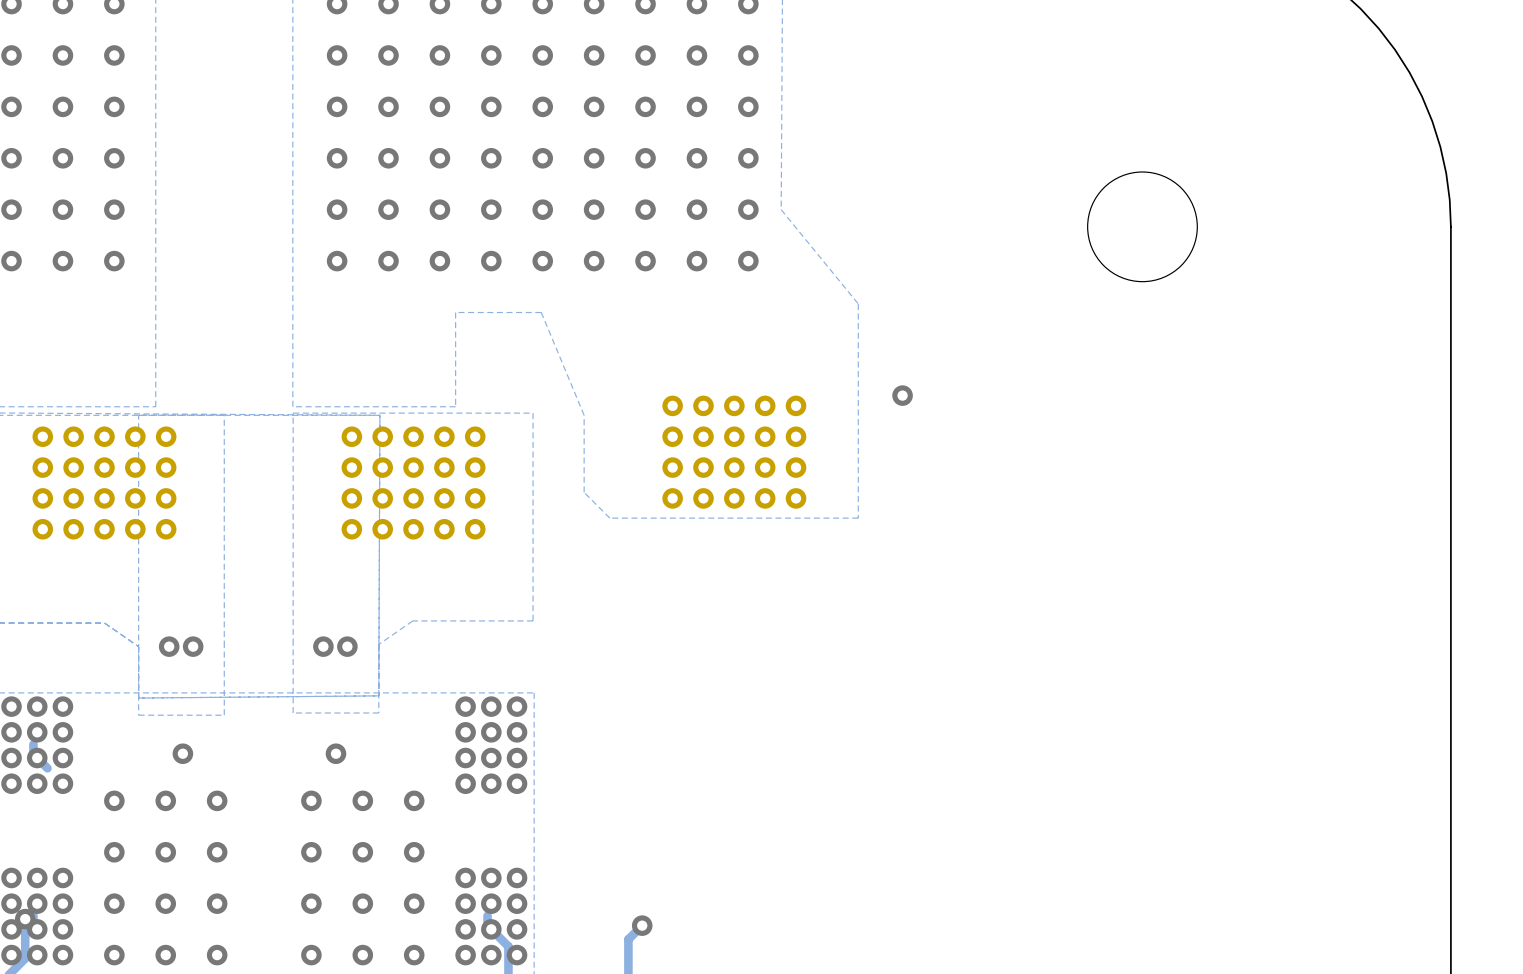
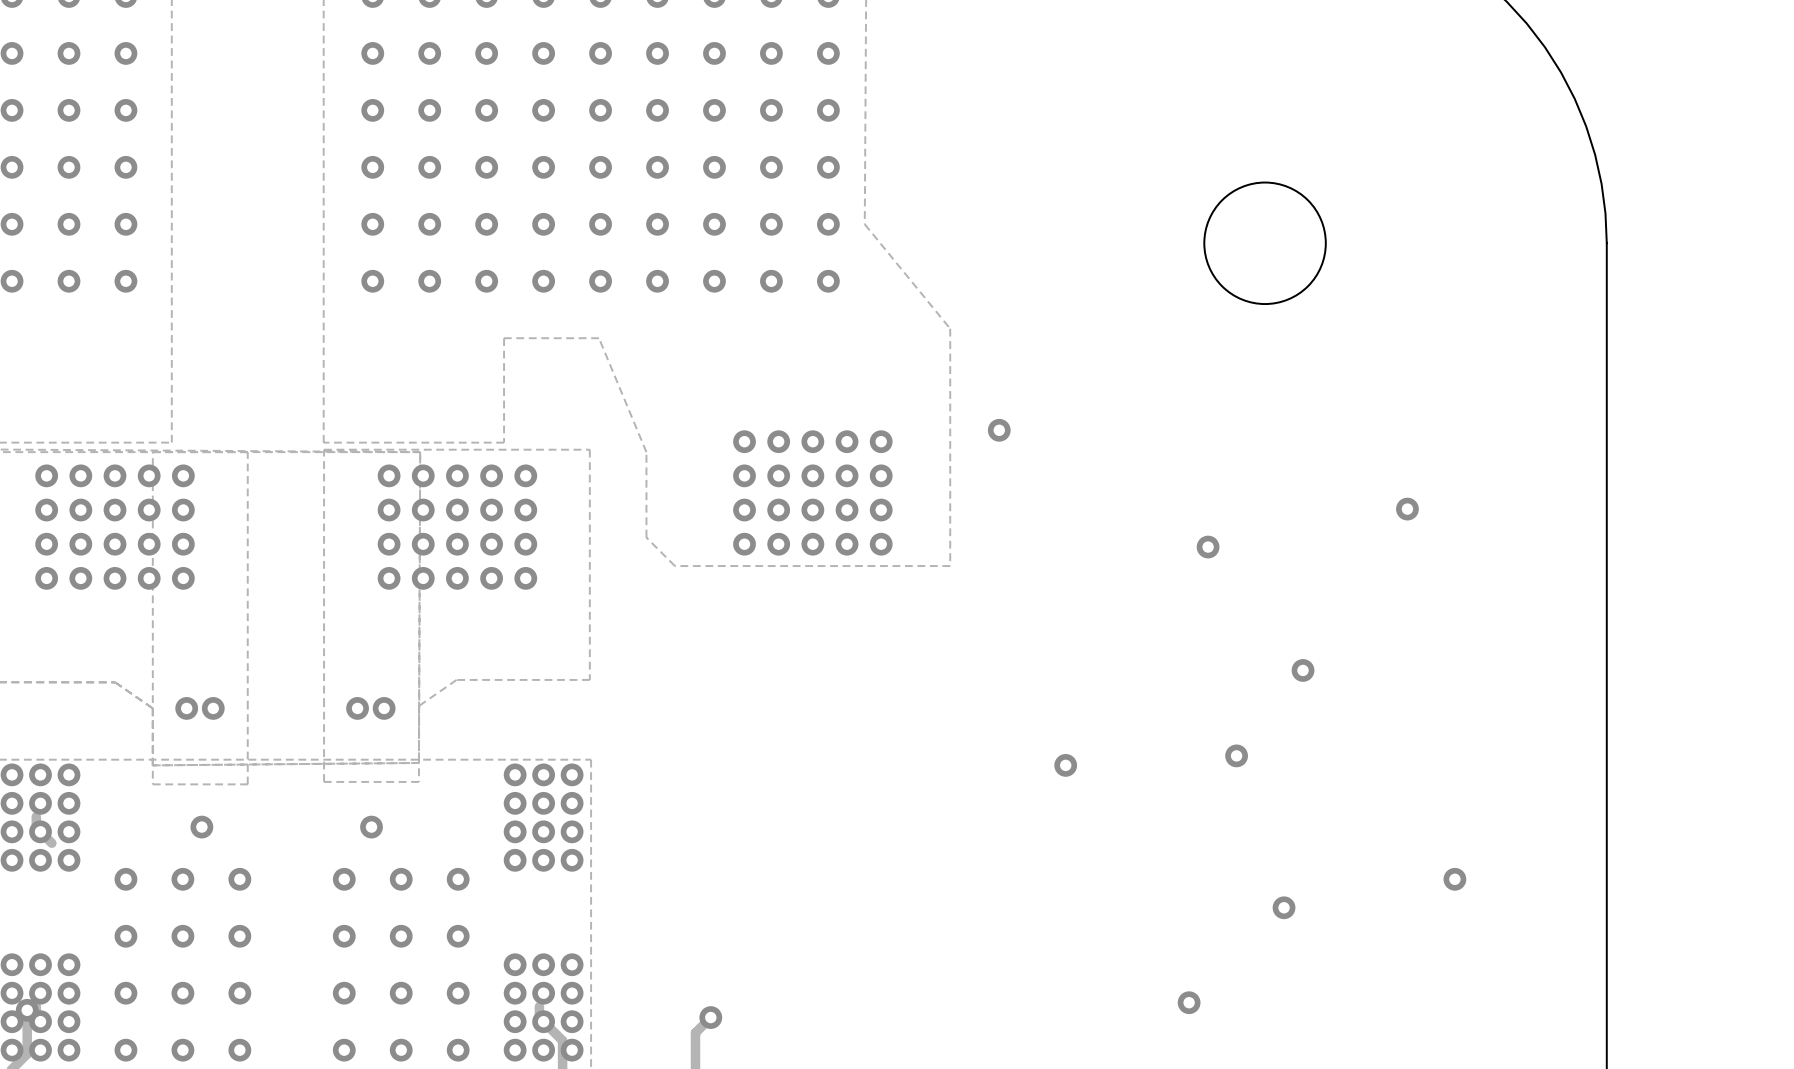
via: none -> (1407, 509)
via: none -> (1208, 547)
via: none -> (1303, 670)
via: none -> (1236, 755)
via: none -> (1065, 765)
via: none -> (1454, 879)
via: none -> (1284, 907)
via: none -> (1189, 1002)

